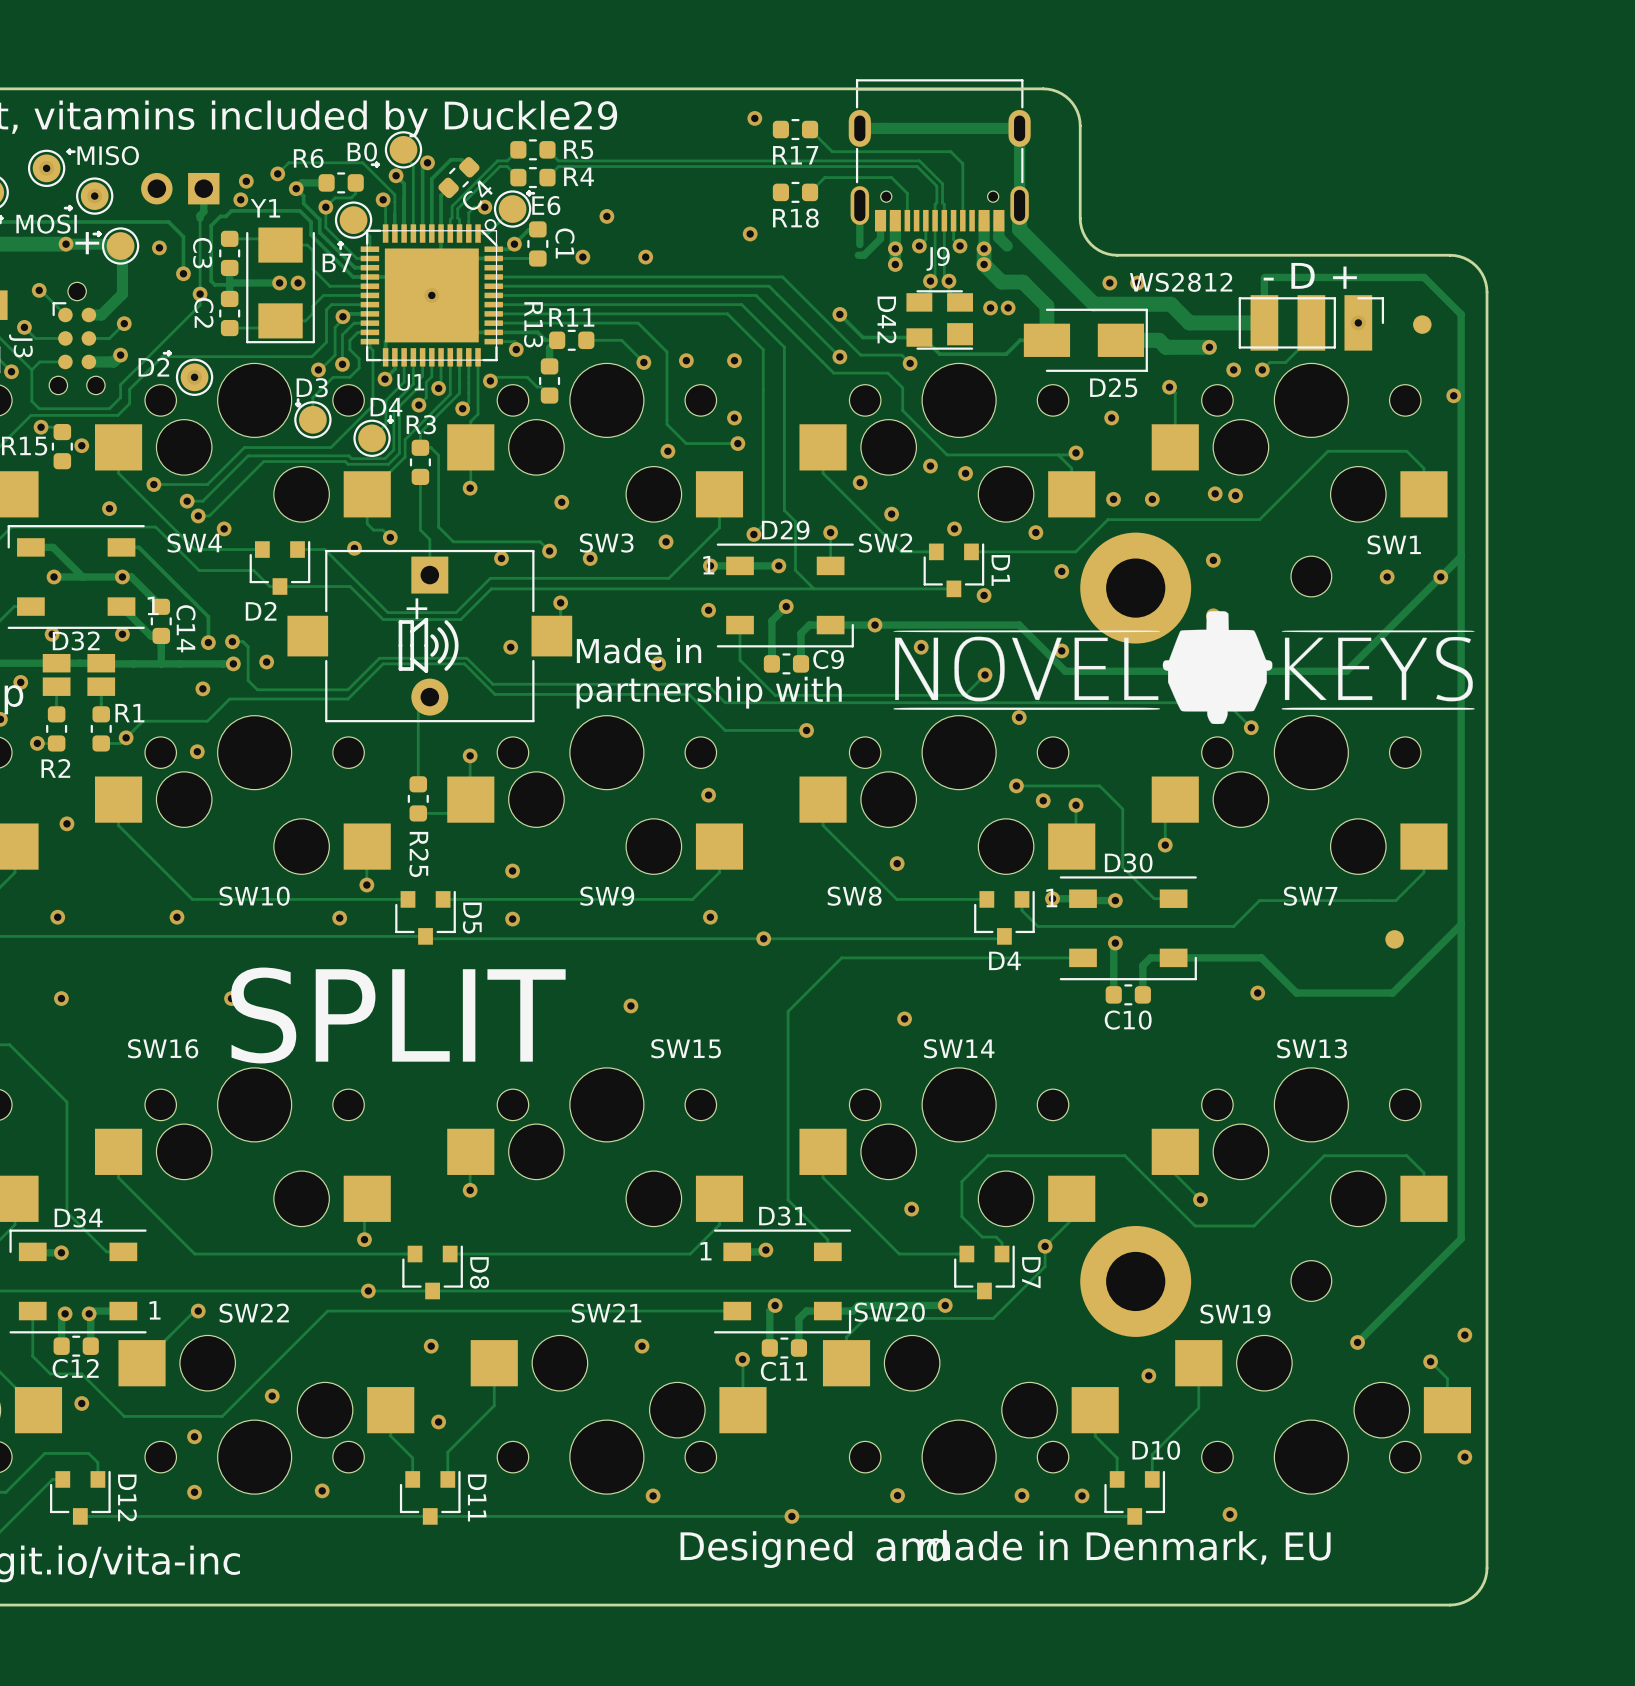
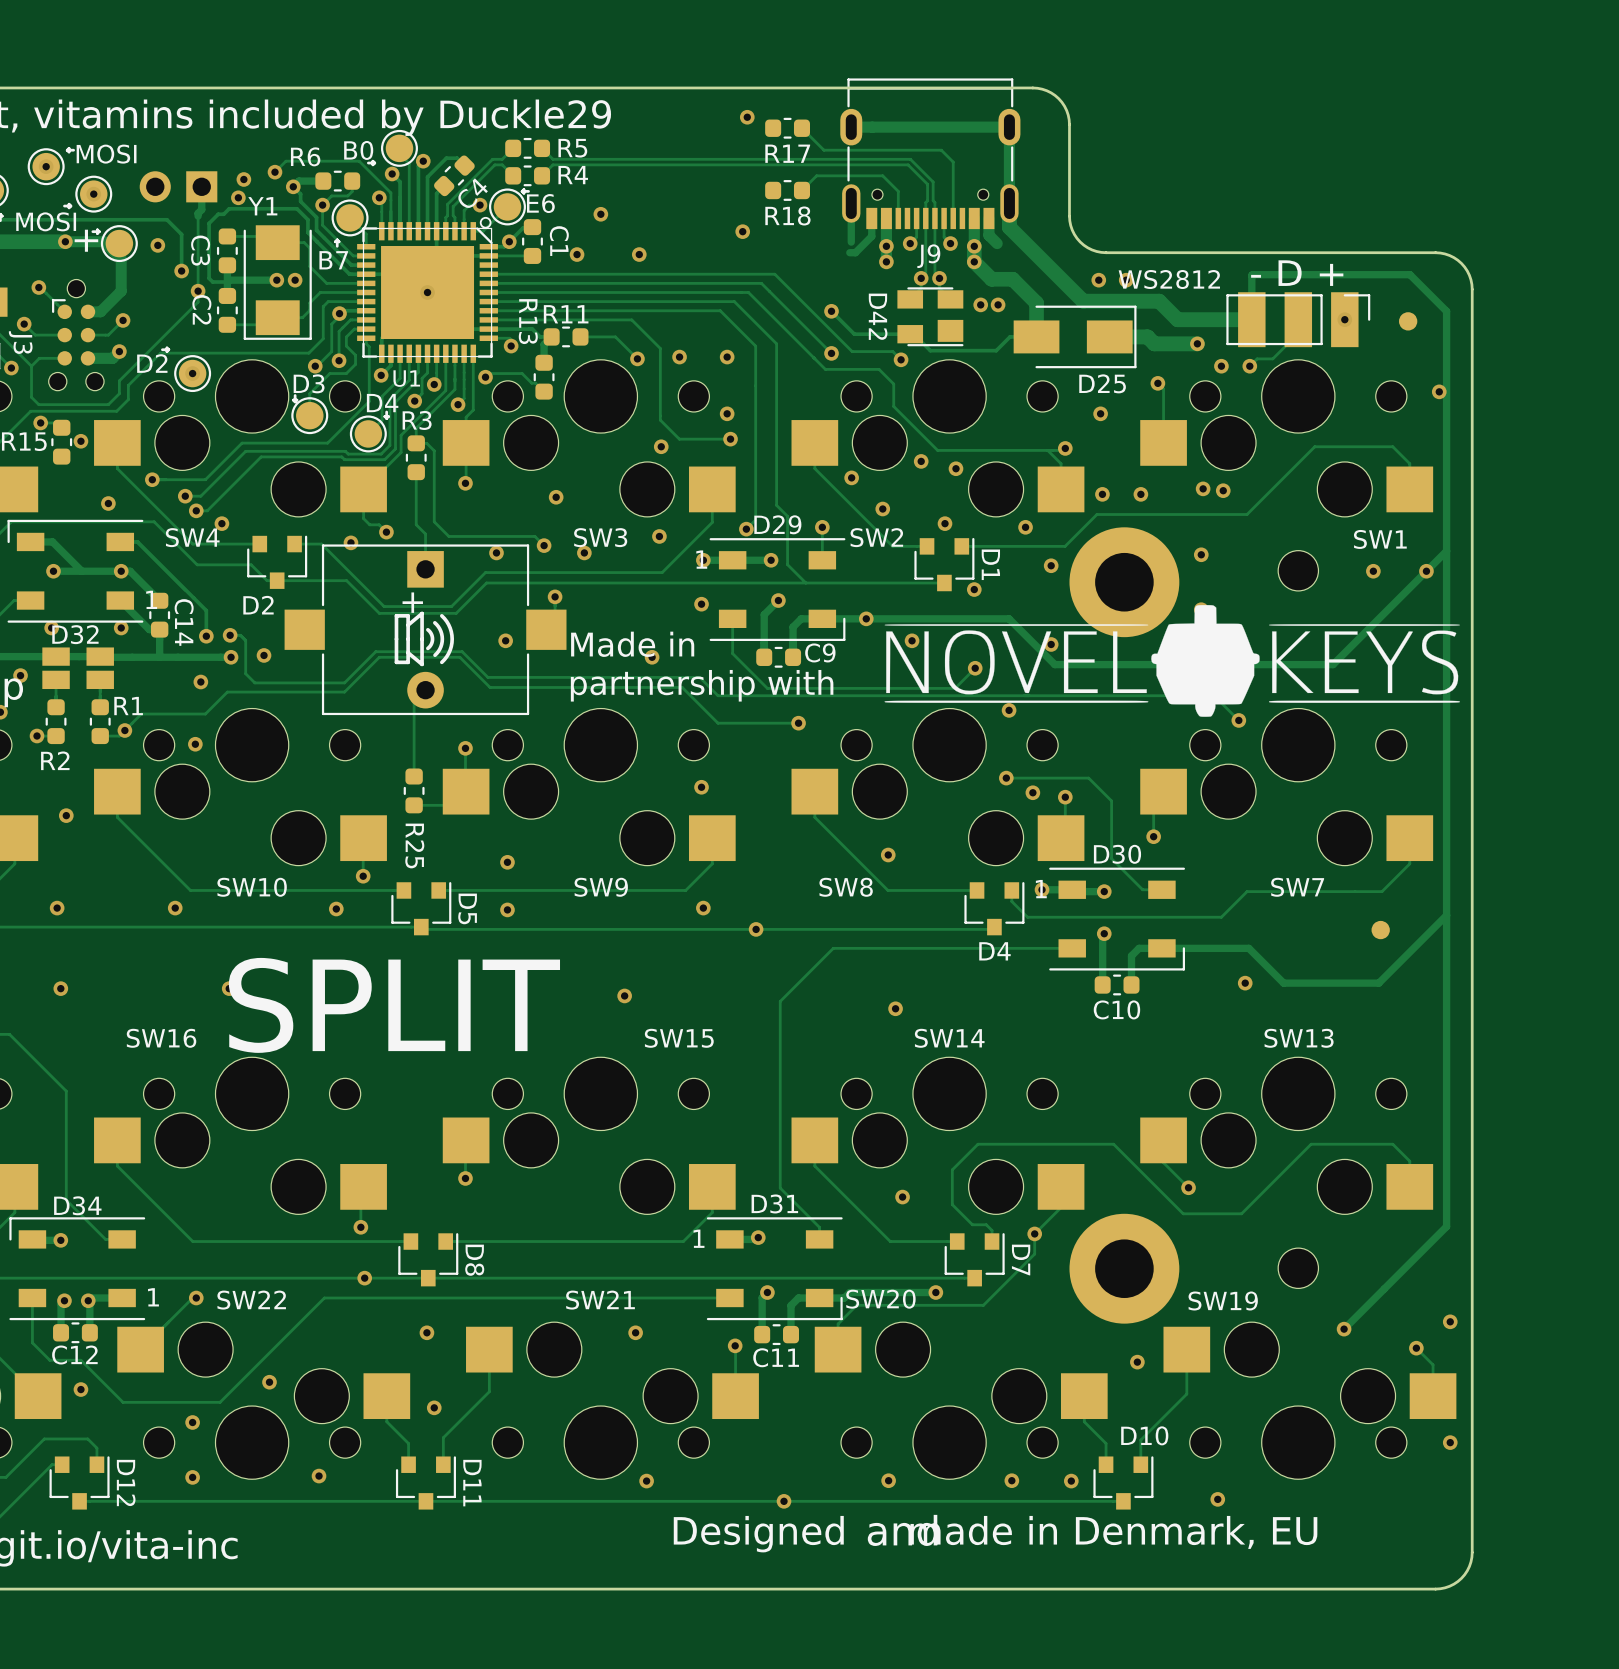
text: MISO (108, 155) -> MOSI (106, 154)

